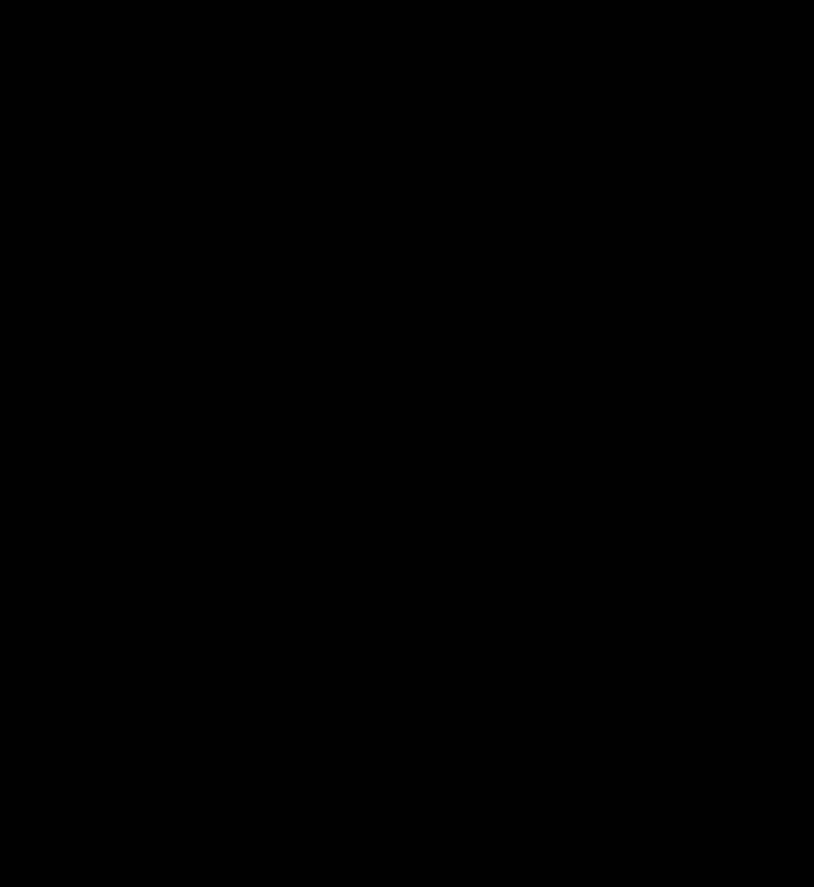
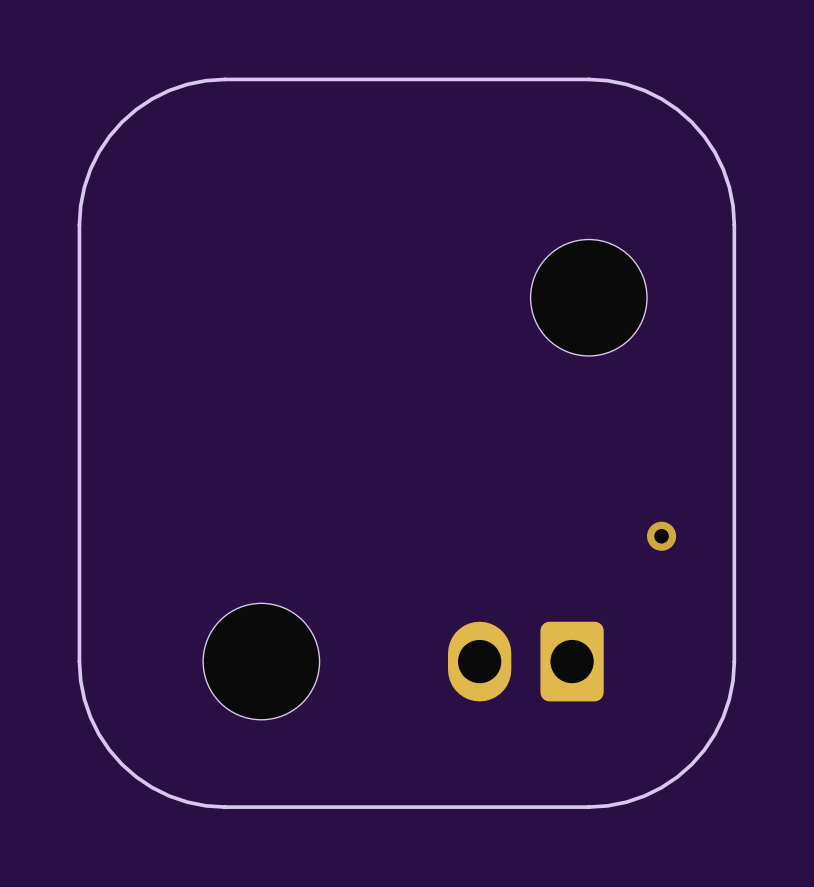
board edge: none -> (588, 79) (205, 80) (169, 90) (152, 98) (122, 122) (98, 152) (84, 187) (79, 224) (80, 680) (90, 717) (109, 750) (136, 777) (152, 787) (187, 802) (224, 807) (607, 805) (644, 796) (677, 777) (704, 750) (714, 734) (729, 699) (734, 661) (733, 205) (723, 169) (714, 152) (691, 122) (677, 109) (661, 98) (626, 84) (588, 79)
part: none -> (588, 297)
via: none -> (661, 536)
part: none -> (261, 661)
part: none -> (525, 661)

